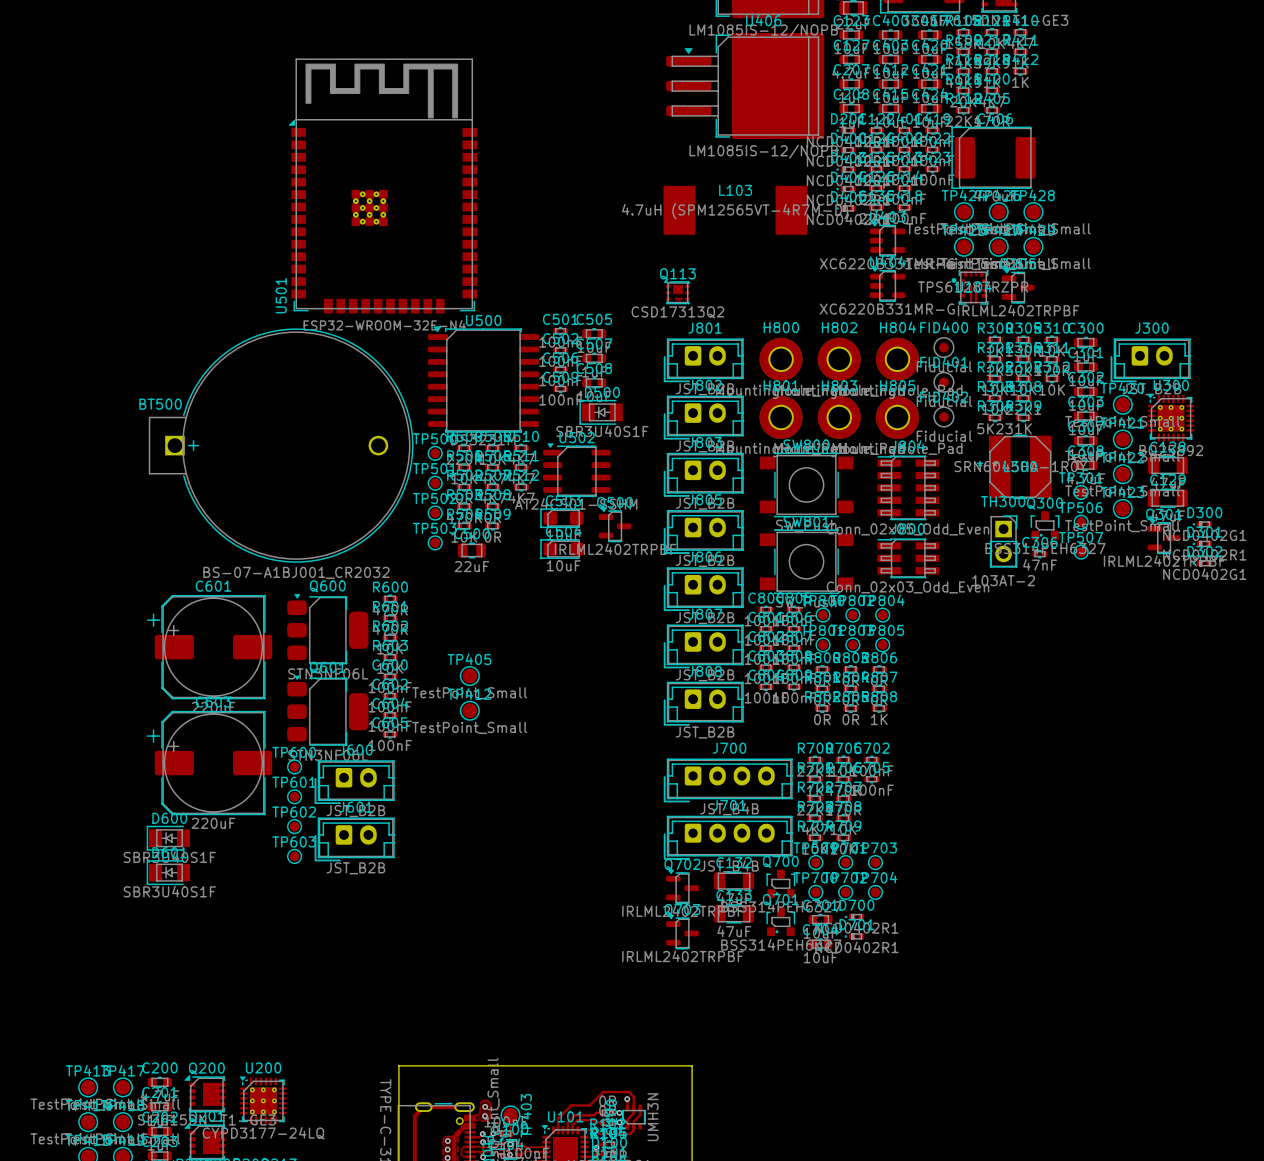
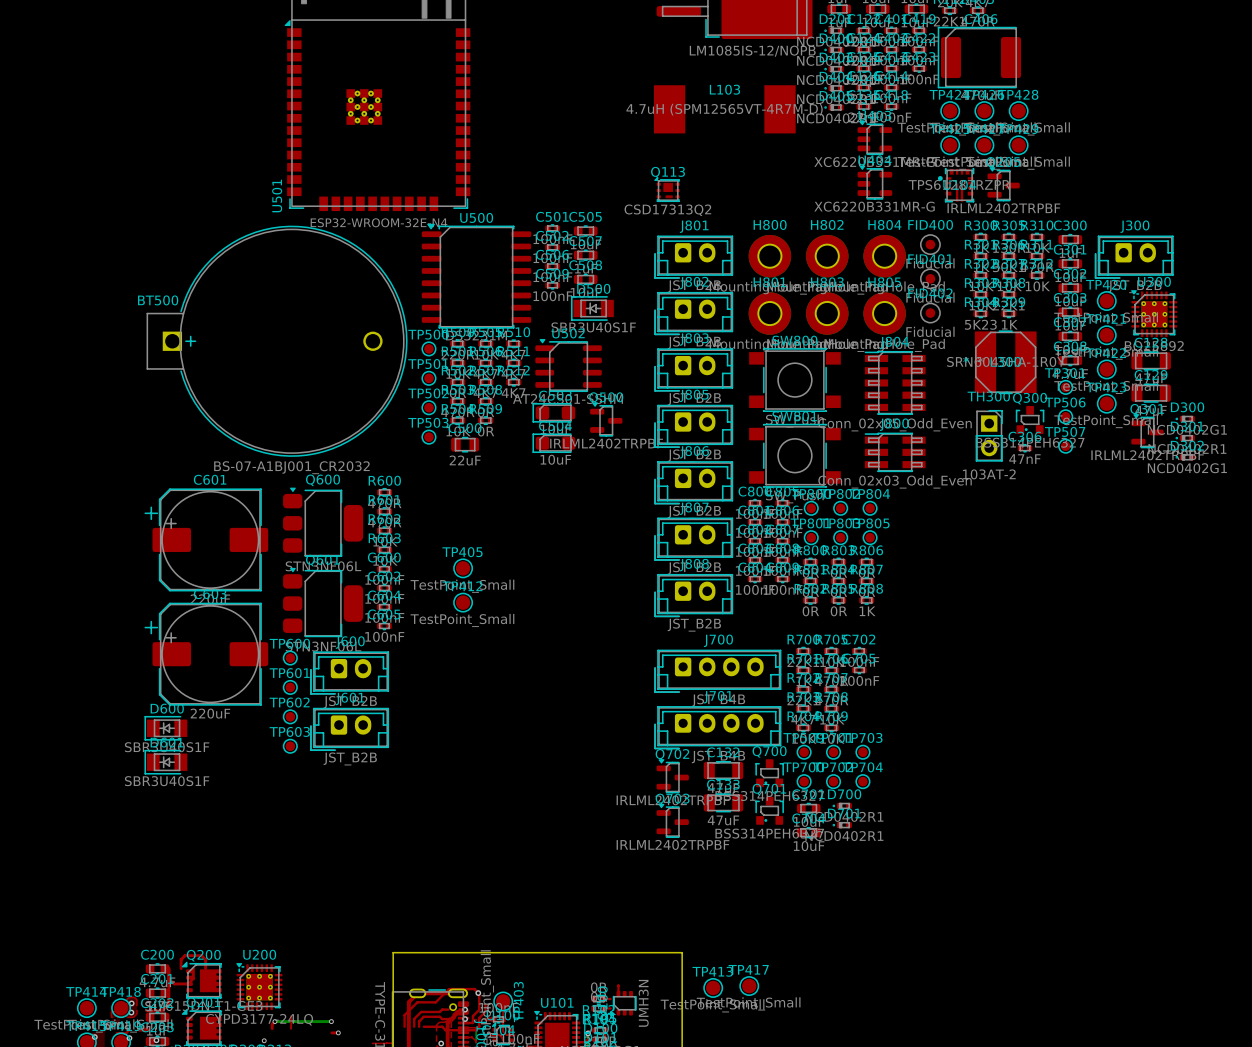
top track: none -> (168, 968) (168, 1004) (162, 1010) (146, 1010)
top track: none -> (181, 968) (181, 959) (185, 955) (201, 955) (205, 959) (205, 968)
top track: none -> (193, 968) (193, 978) (188, 983) (174, 983) (168, 978)
TP413 position: (88, 1087) -> (713, 987)
TP417 position: (122, 1087) -> (749, 986)
via: (627, 1099) -> none
top zone outline: (482, 1100) (480, 1103) (480, 1112) (477, 1115) (464, 1115) (464, 1121) (487, 1121) (490, 1117) (490, 1103) (488, 1100) (482, 1100) -> none
top track: (640, 1107) (640, 1115) (633, 1121) (633, 1130) (630, 1133) (599, 1133) (596, 1130) (577, 1130) -> (485, 1004) (485, 1011) (479, 1018) (479, 1026) (475, 1030) (445, 1030) (442, 1026) (423, 1026)
top zone outline: none -> (129, 997) (126, 999) (126, 1009) (124, 1011) (111, 1011) (111, 1017) (133, 1017) (136, 1014) (136, 999) (134, 997) (129, 997)
top track: (602, 1112) (596, 1112) (593, 1115) (574, 1115) (567, 1122) (567, 1130) -> (448, 1009) (442, 1009) (439, 1011) (421, 1011) (414, 1018) (414, 1026)
via: (619, 1112) -> none
via: (485, 1116) -> none
via: none -> (131, 1003)
top track: (602, 1122) (577, 1120) (572, 1125) (572, 1130) -> (448, 1019) (423, 1016) (419, 1021) (419, 1026)
via: (619, 1122) -> none
via: none -> (465, 1009)
via: none -> (131, 1012)
top track: (627, 1126) (627, 1119) (633, 1113) (633, 1096) (629, 1092) (603, 1092) (589, 1105) (571, 1105) (558, 1118) (558, 1130) -> (472, 1022) (472, 1016) (479, 1009) (479, 993) (474, 989) (449, 989) (435, 1002) (417, 1002) (404, 1015) (404, 1026)
top track: none -> (291, 1016) (291, 1028)
via: none -> (465, 1019)
via: (482, 1133) -> none
via: (493, 1133) -> none
top track: none -> (274, 1021) (272, 1024) (272, 1028)
bottom track: none -> (274, 1021) (331, 1021)
via: none -> (274, 1021)
via: none -> (331, 1021)
via: (447, 1141) -> none
via: (483, 1142) -> none
top track: none -> (139, 1029) (147, 1029)
top track: none -> (129, 1030) (126, 1033) (116, 1033)
top track: (502, 1144) (498, 1144) (495, 1147) (463, 1146) (461, 1154) (463, 1156) (470, 1156) -> none
via: (510, 1144) -> none
top track: (518, 1144) (522, 1144) (525, 1147) (546, 1146) -> none
top track: none -> (331, 1032) (338, 1032)
via: none -> (338, 1032)
via: (447, 1149) -> none
via: none -> (94, 1037)
top track: (478, 1151) (495, 1151) (498, 1154) (502, 1154) -> none
top track: (546, 1151) (525, 1151) (522, 1154) (518, 1154) -> none
via: none -> (129, 1038)
via: none -> (156, 1040)
via: (509, 1154) -> none
via: none -> (264, 1040)
top track: none -> (393, 1043) (372, 1043)
via: (483, 1157) -> none

